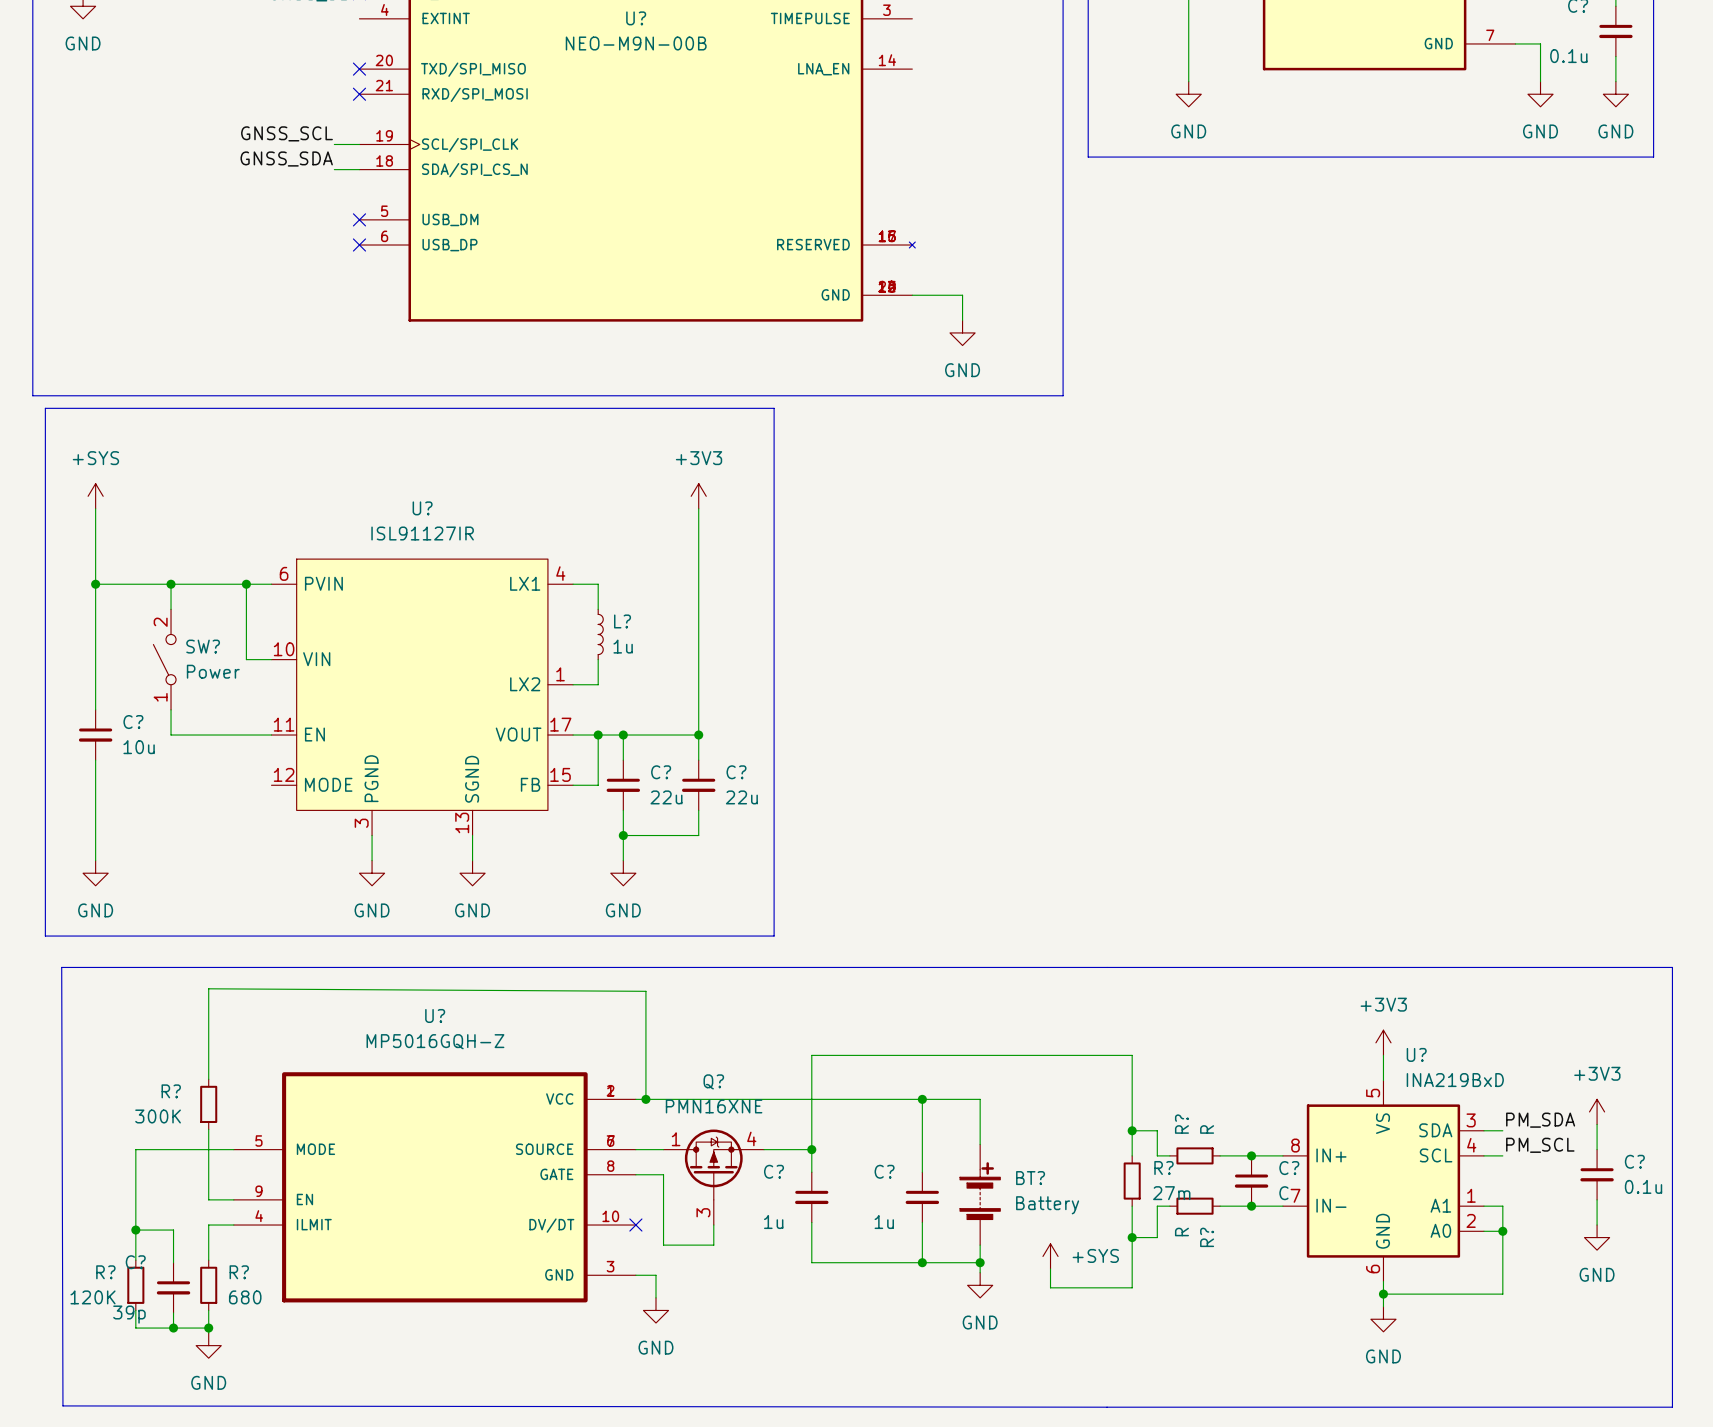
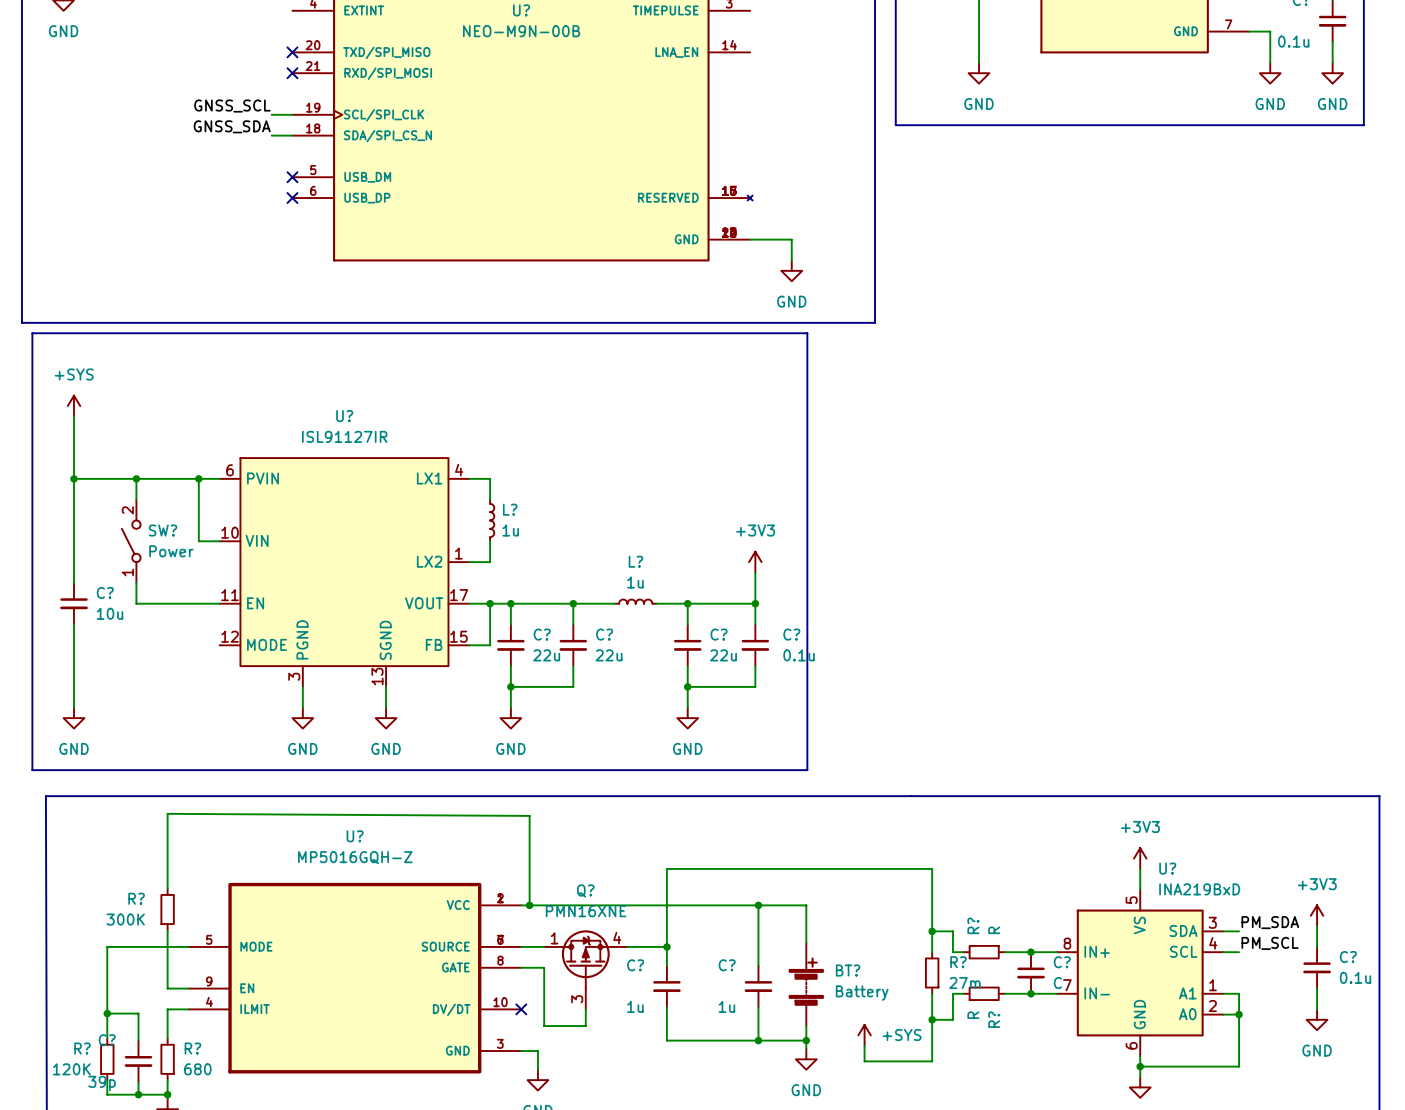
line: (774, 408) (774, 936) -> (635, 333) (807, 333) (807, 770) (635, 770)
power symbol: +3V3 (698, 496) -> none
wire: (698, 508) (698, 735) -> (614, 603) (573, 603)
power symbol: none -> +3V3 (755, 562)
wire: none -> (755, 572) (755, 624)
L?: none -> 1u (635, 601)
wire: none -> (656, 603) (755, 603)
wire: none -> (687, 603) (687, 624)
junction: none -> (687, 603)
junction: none -> (755, 603)
C?: none -> 22u (687, 645)
C?: none -> 0.1u (755, 645)
wire: none -> (687, 666) (687, 707)
wire: none -> (755, 666) (755, 686) (687, 686)
junction: none -> (687, 686)
power symbol: none -> GND (687, 718)

